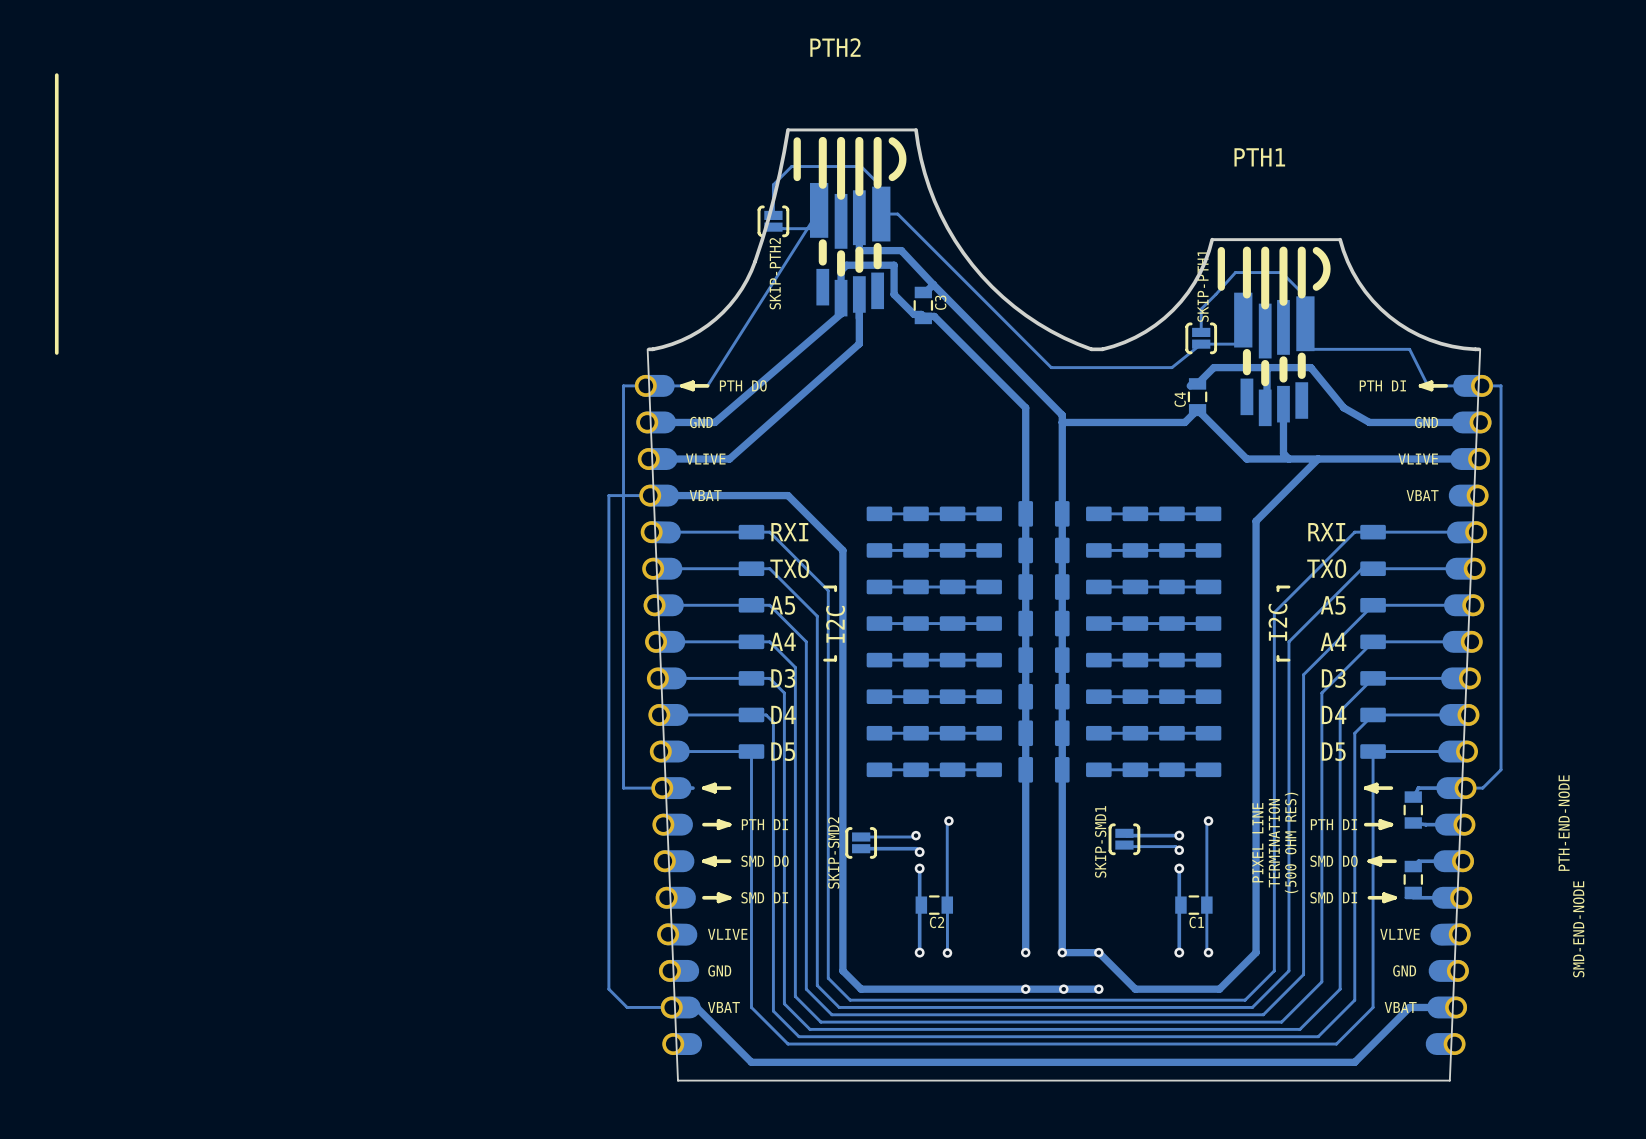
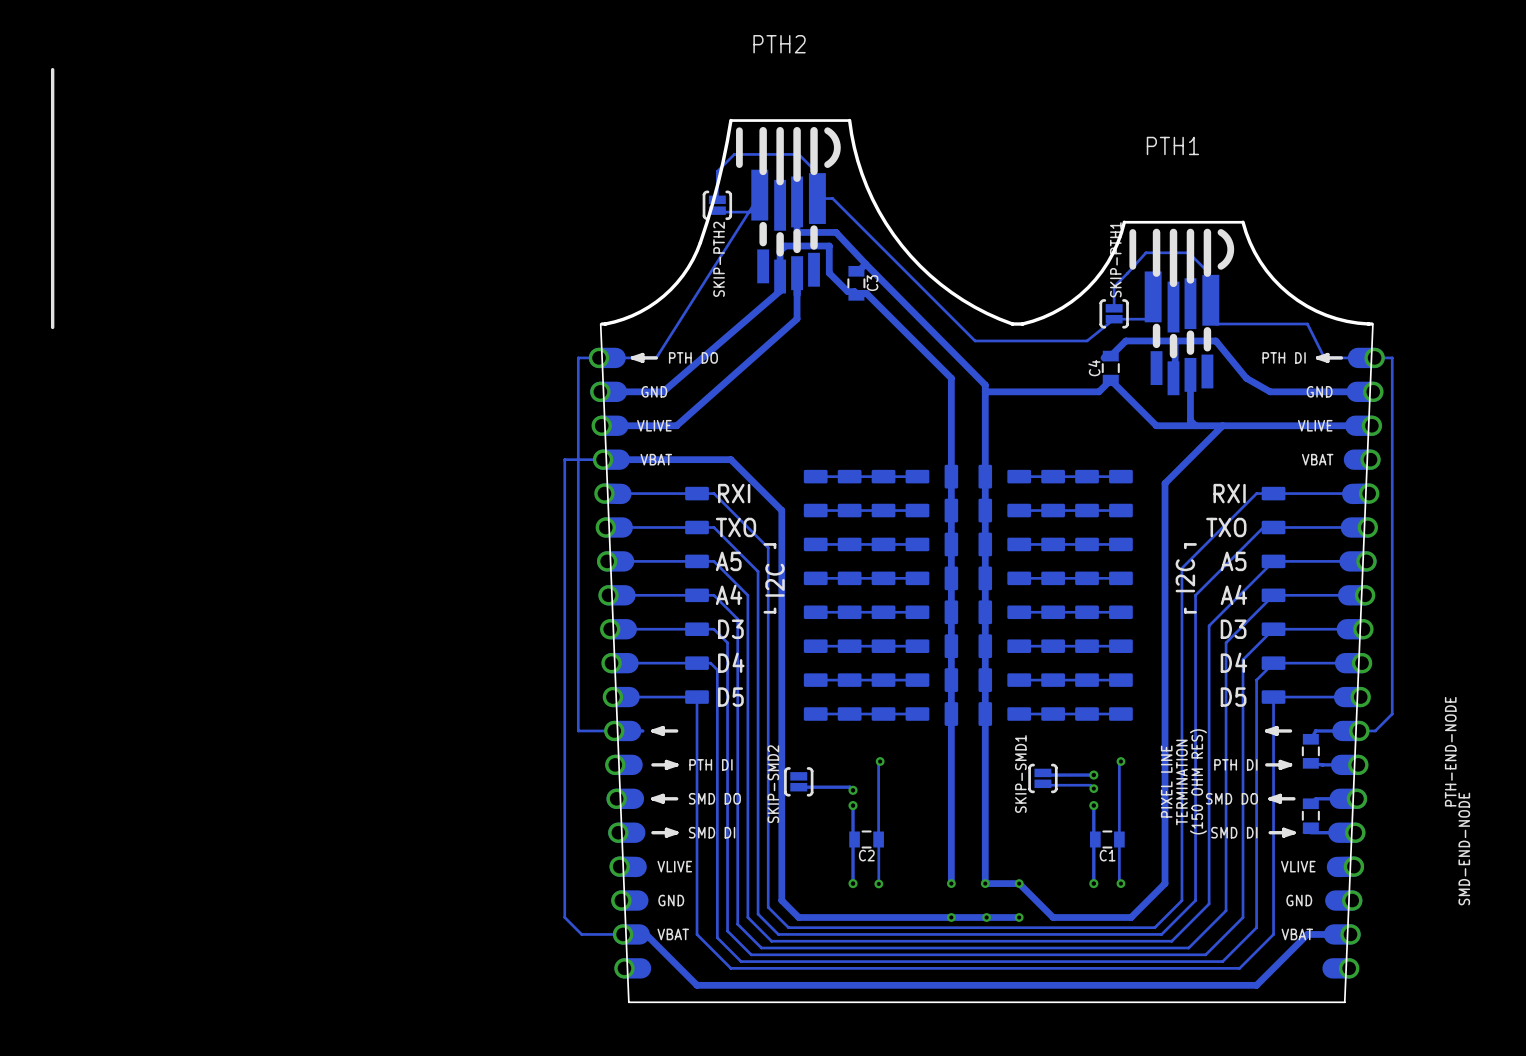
track: (916, 835) (861, 836) -> none
via: (916, 835) -> none
text: (500 OHM RES) (1291, 842) -> (150 OHM RES) (1198, 781)

